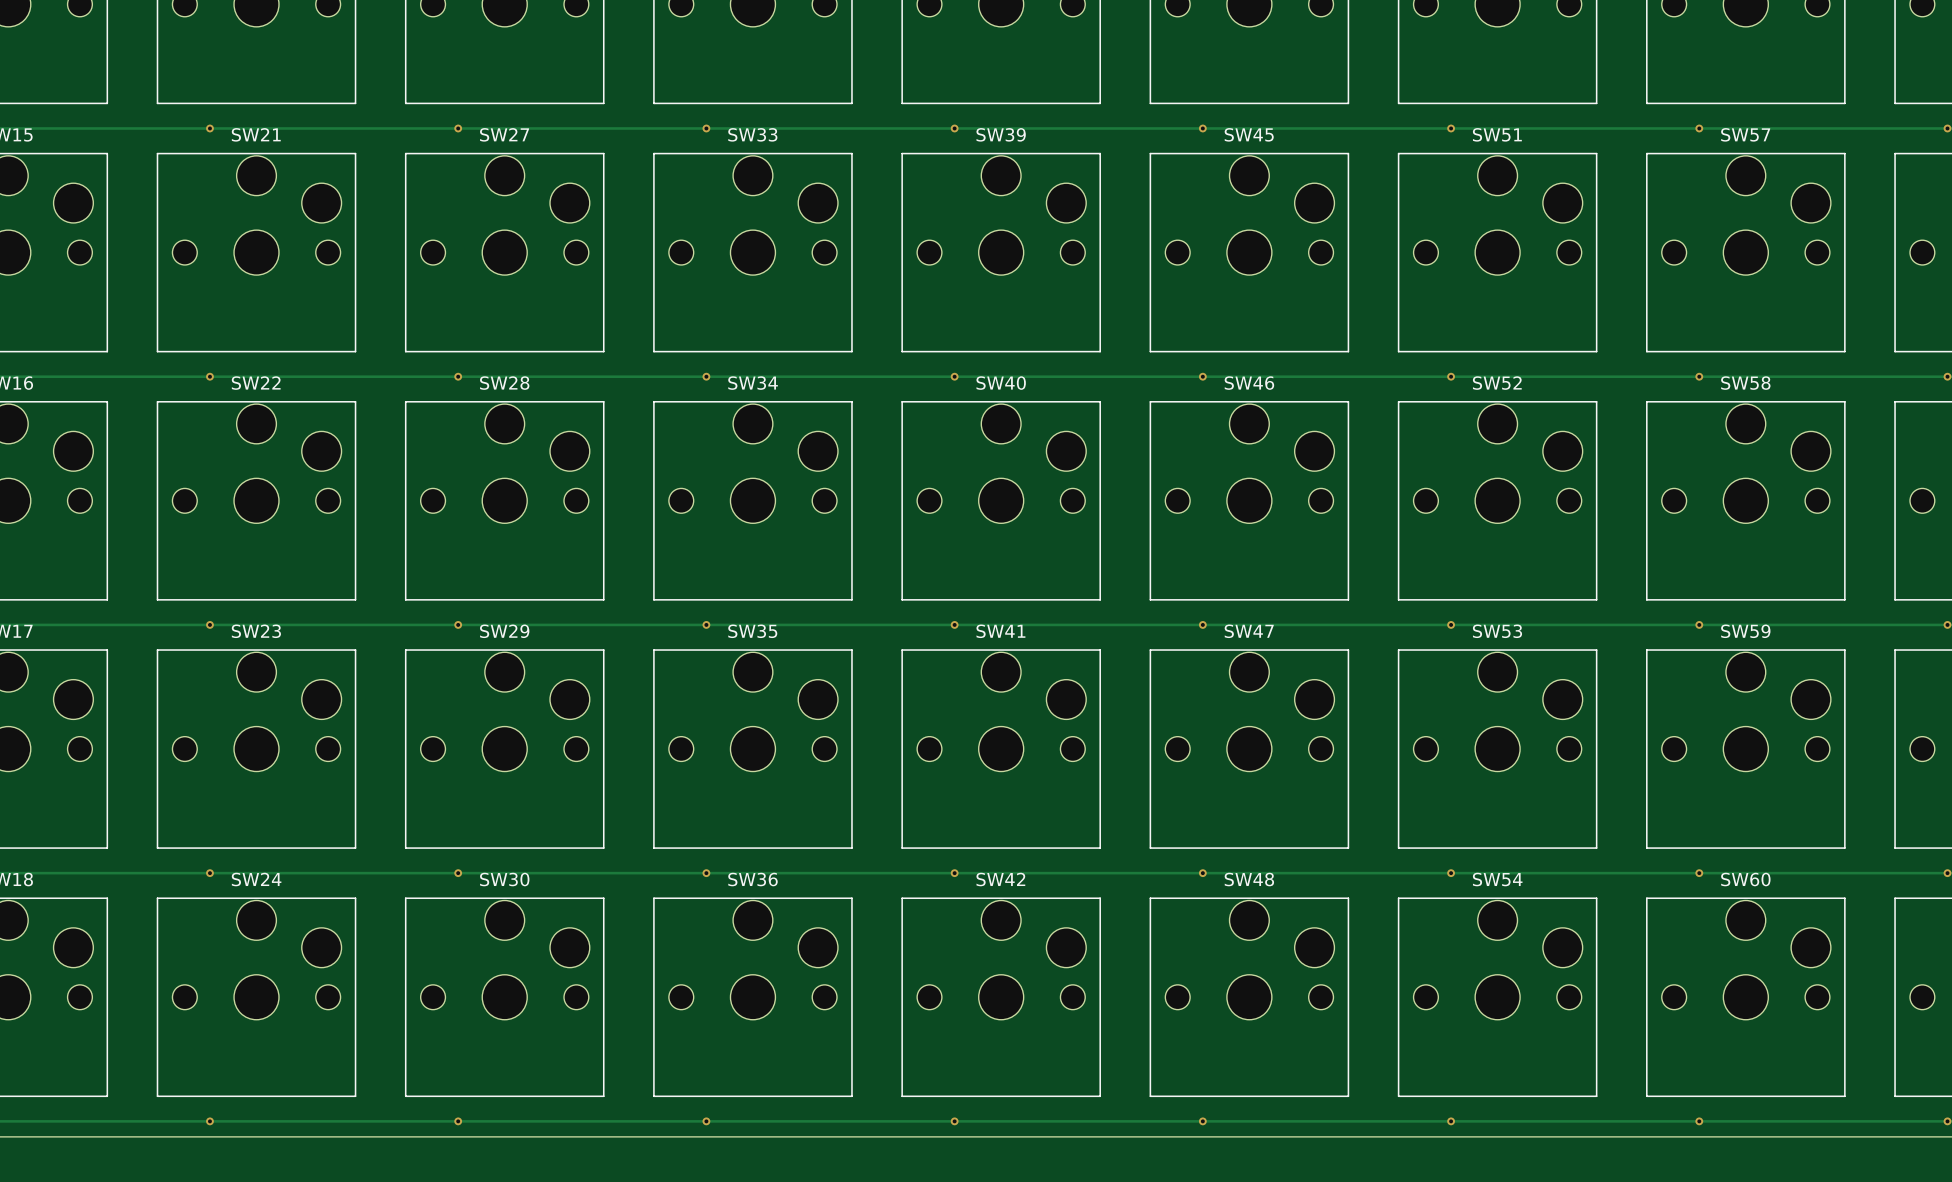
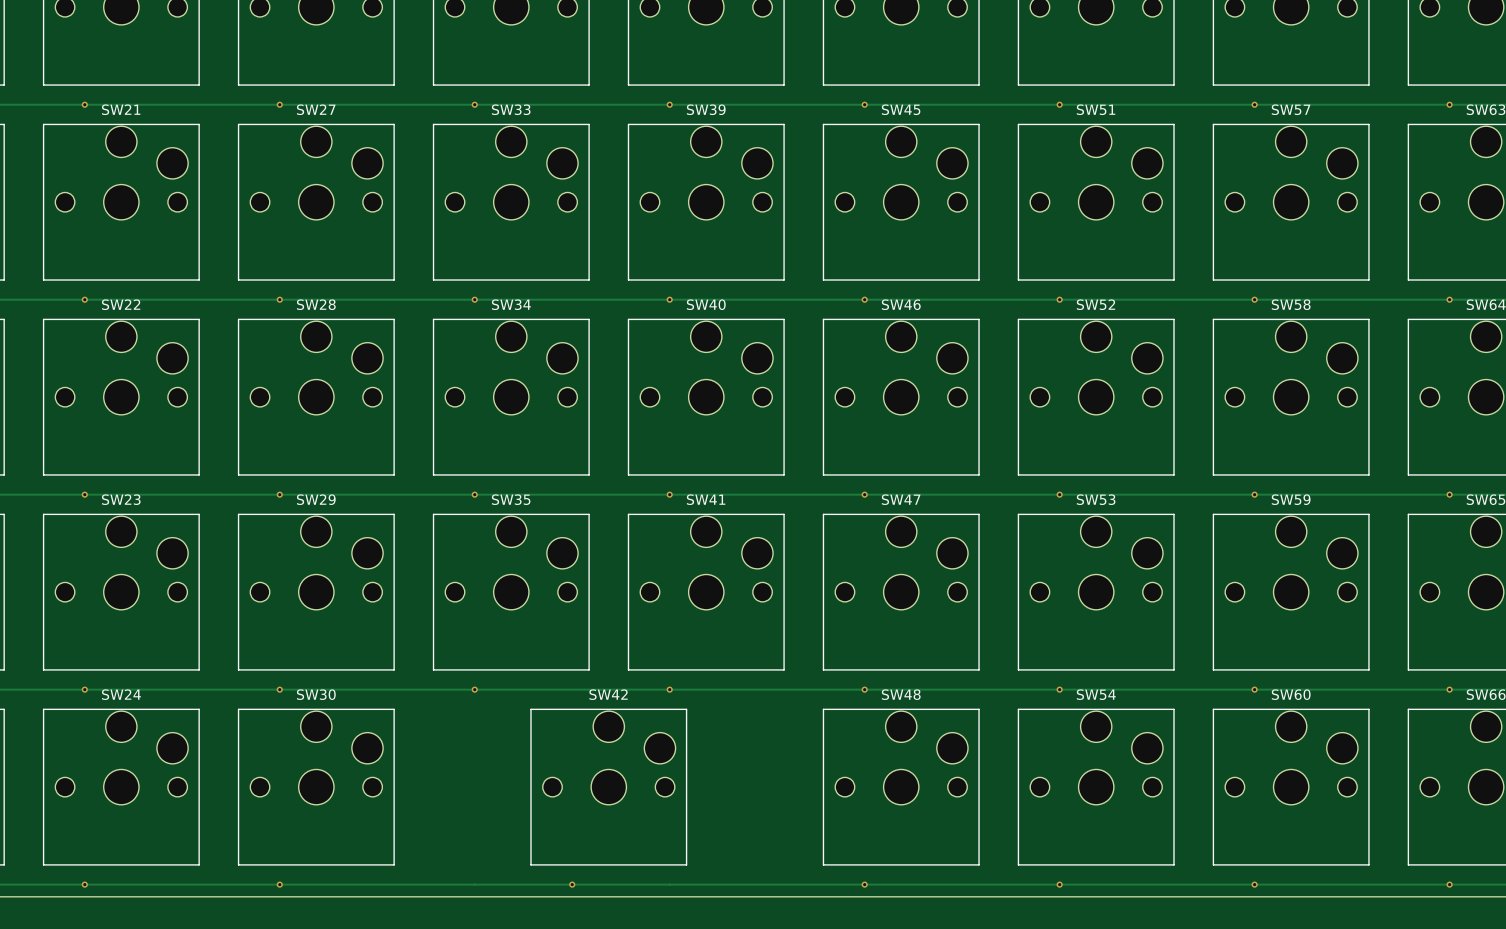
SW36: (752, 997) -> none
SW42 position: (1001, 997) -> (608, 787)
via: (706, 1121) -> none
via: none -> (572, 884)
via: (954, 1121) -> none

